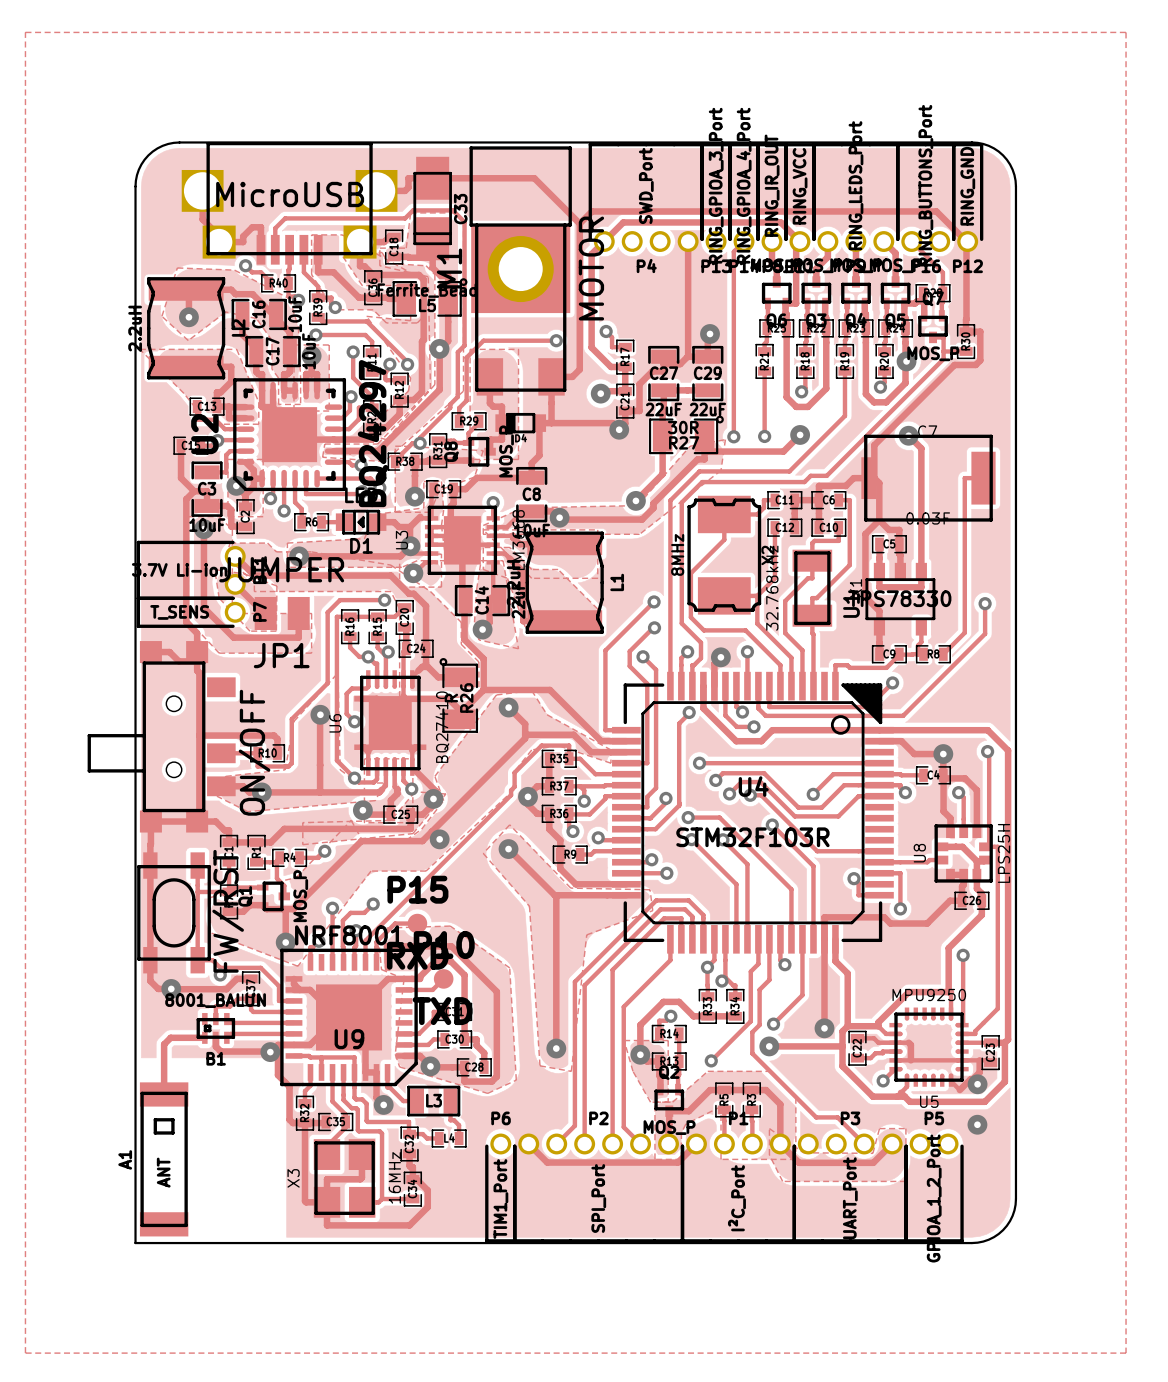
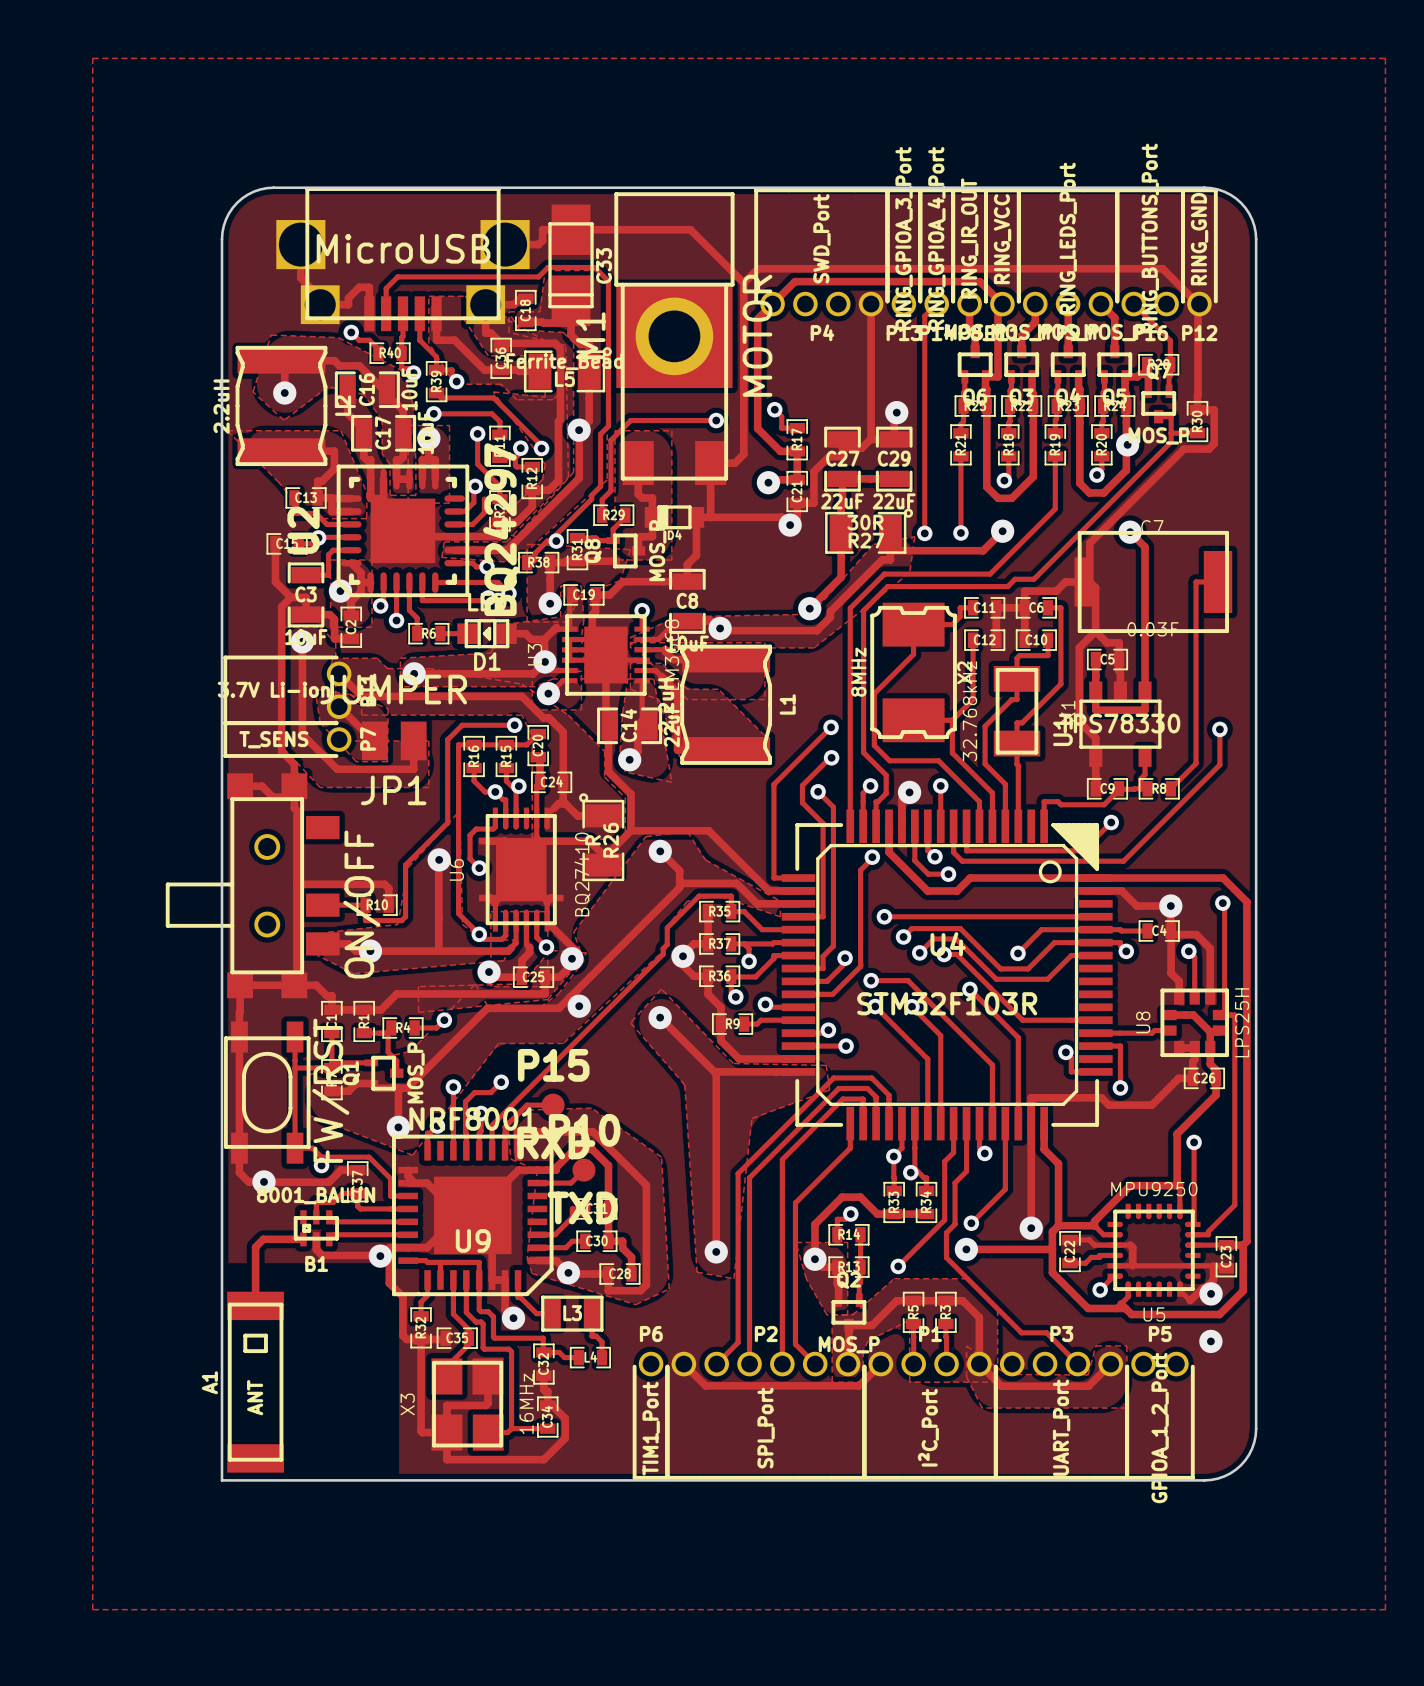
part footprint: [87, 641, 236, 833] -> [165, 773, 340, 999]

